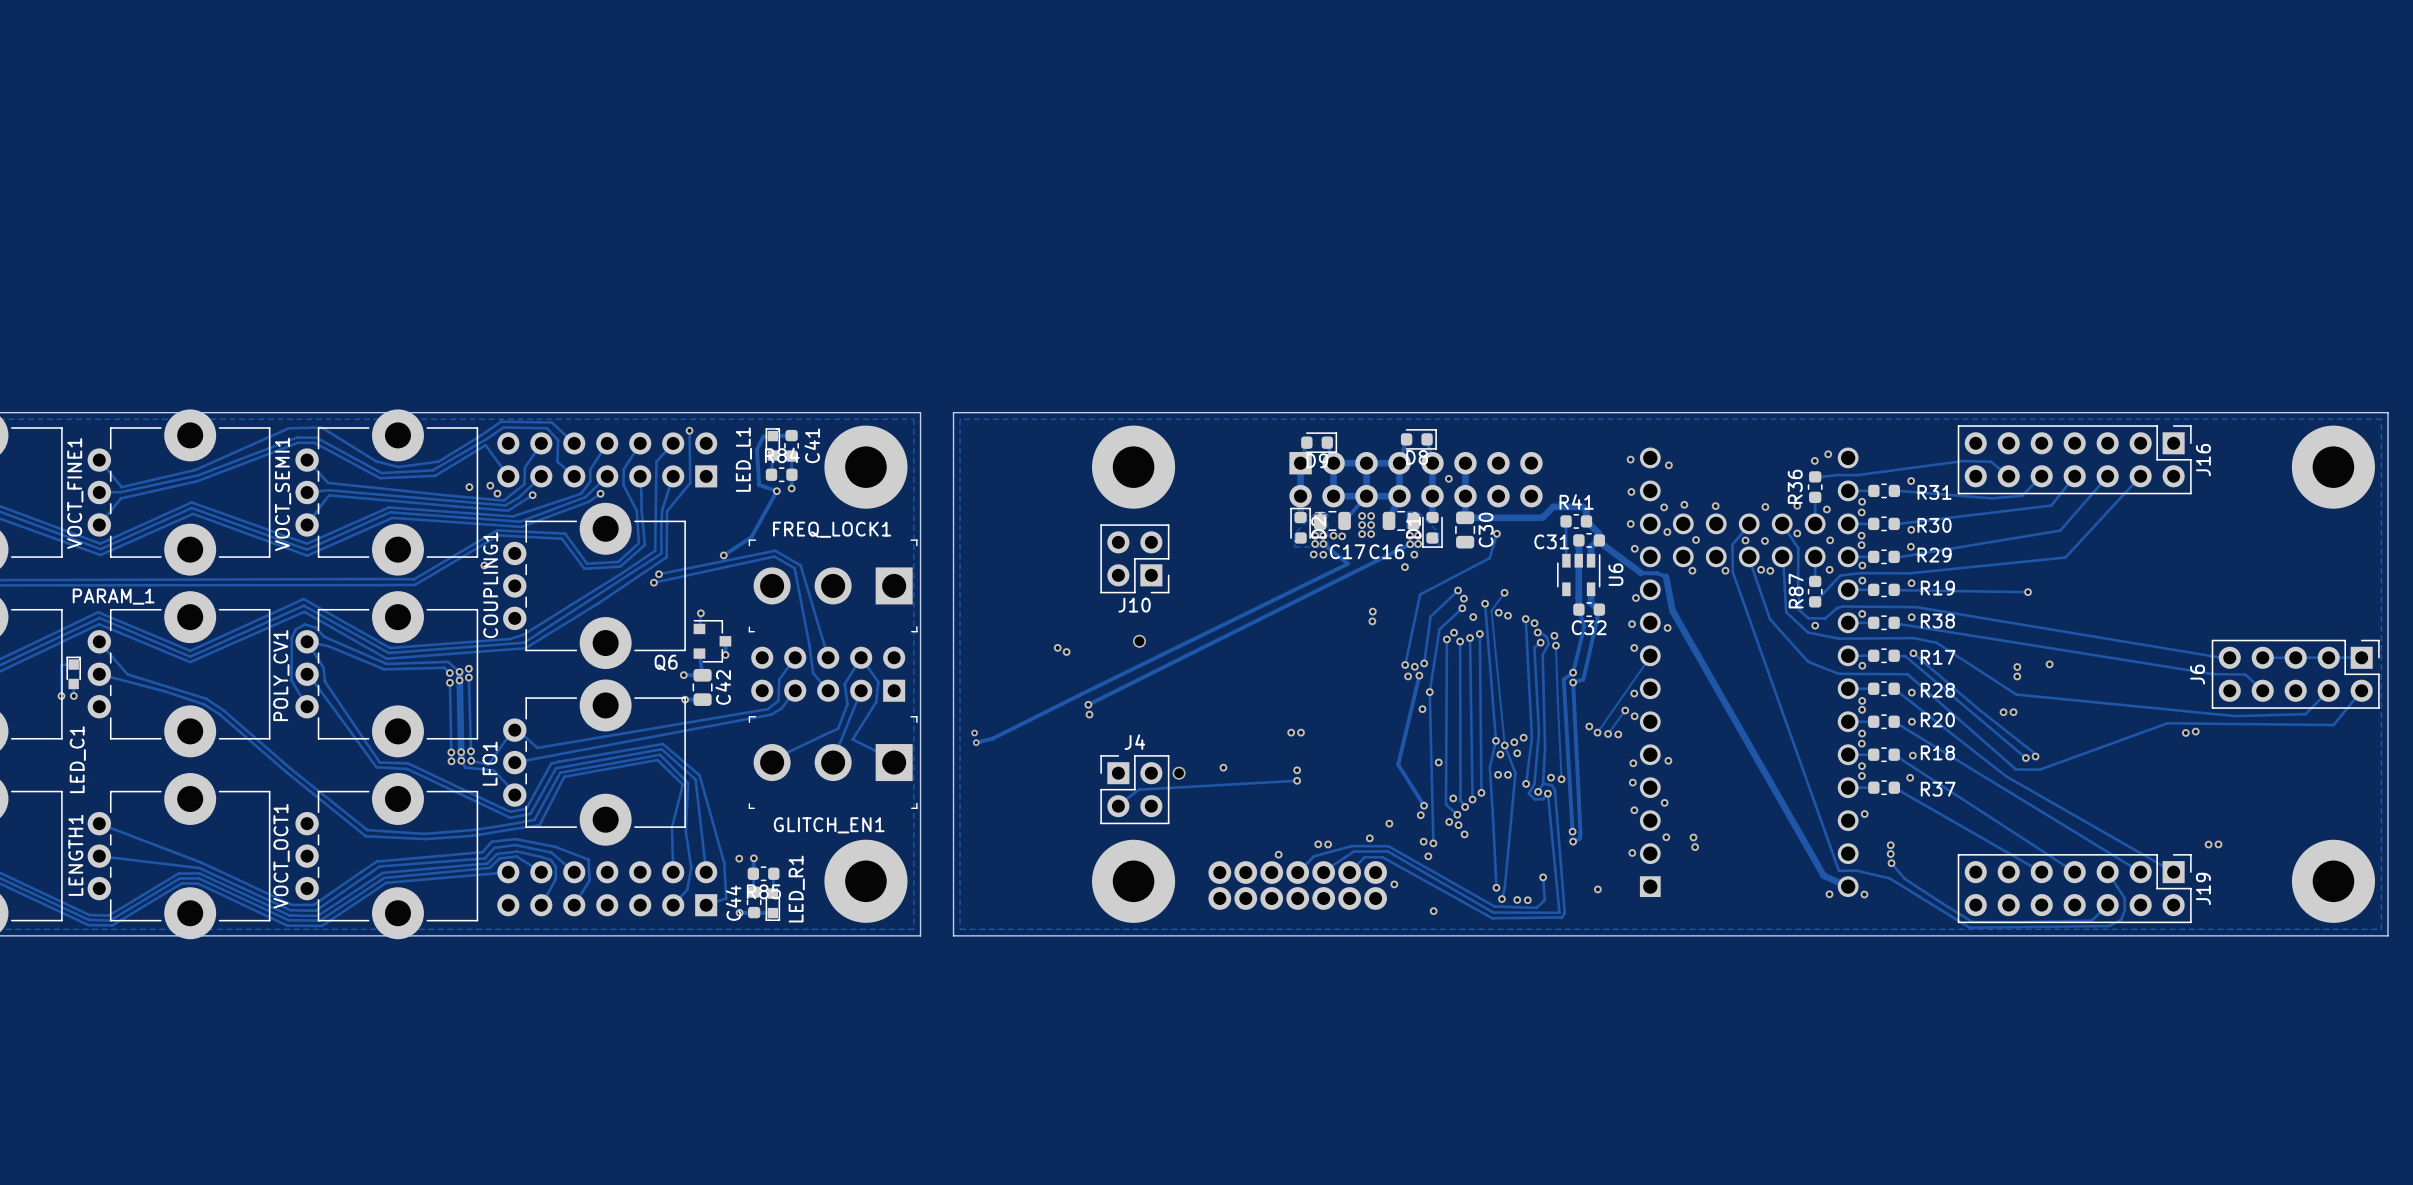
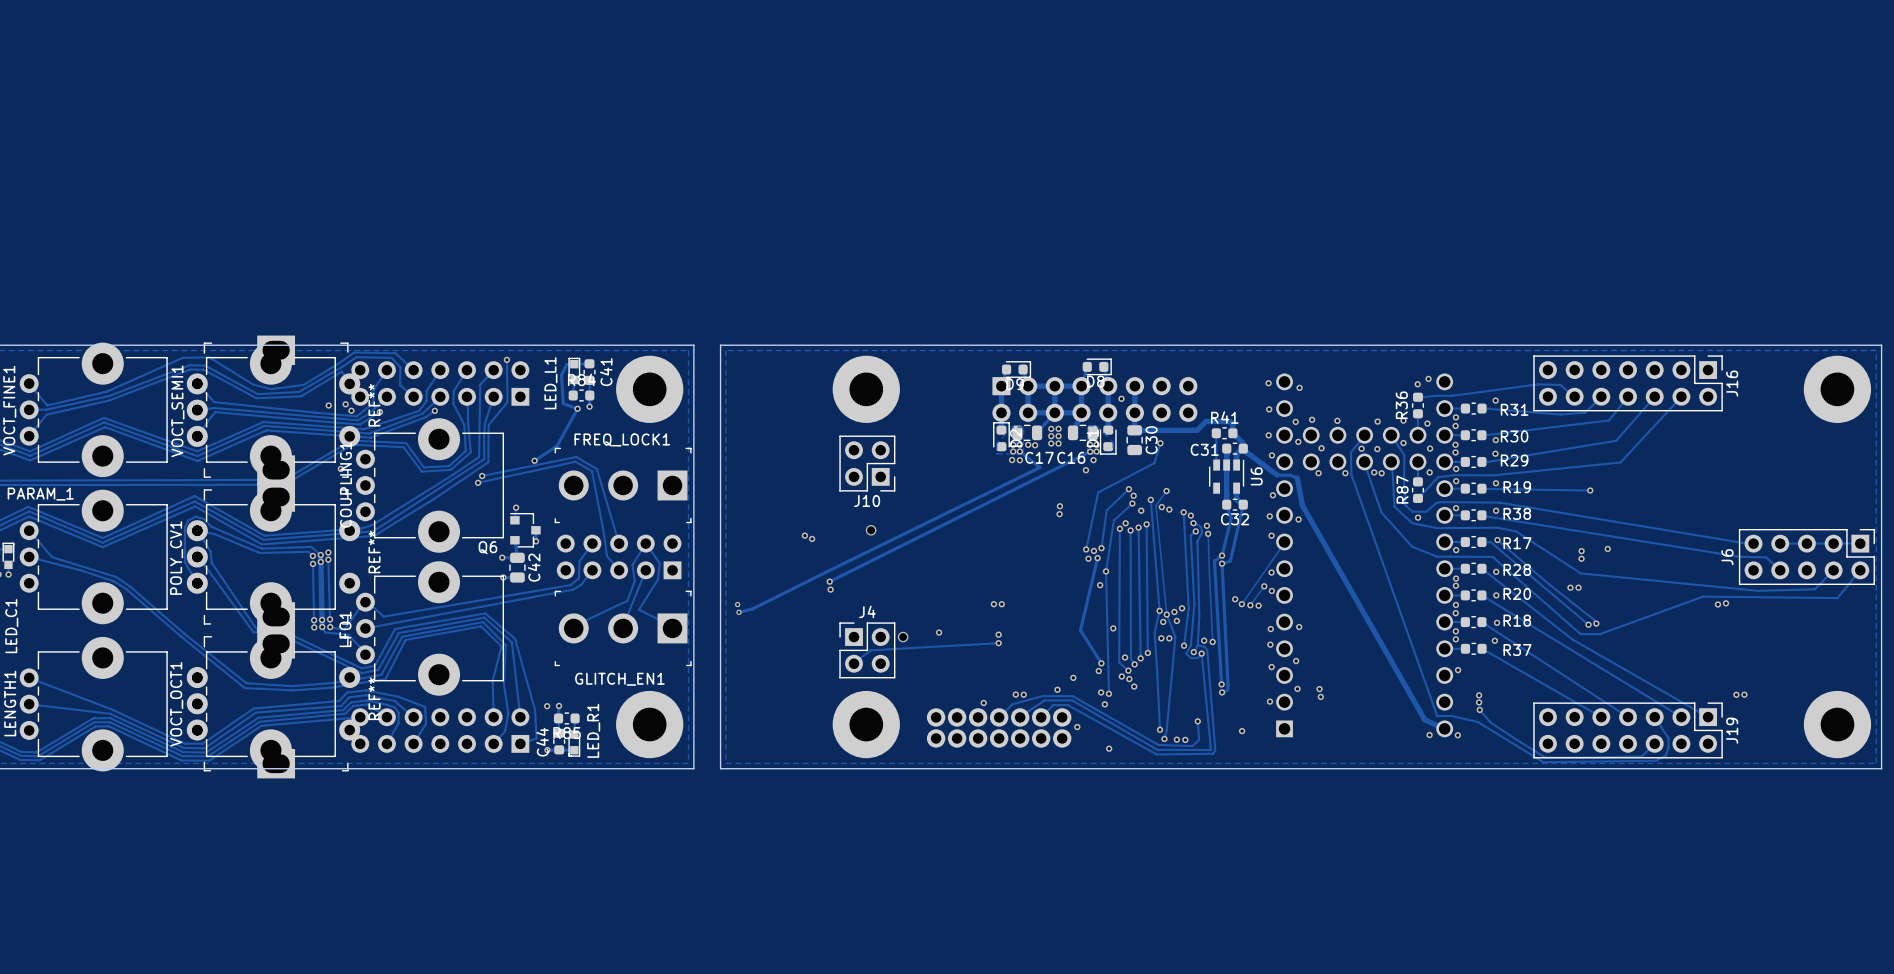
REF**: none -> (273, 410)
REF**: none -> (273, 556)
REF**: none -> (273, 703)

